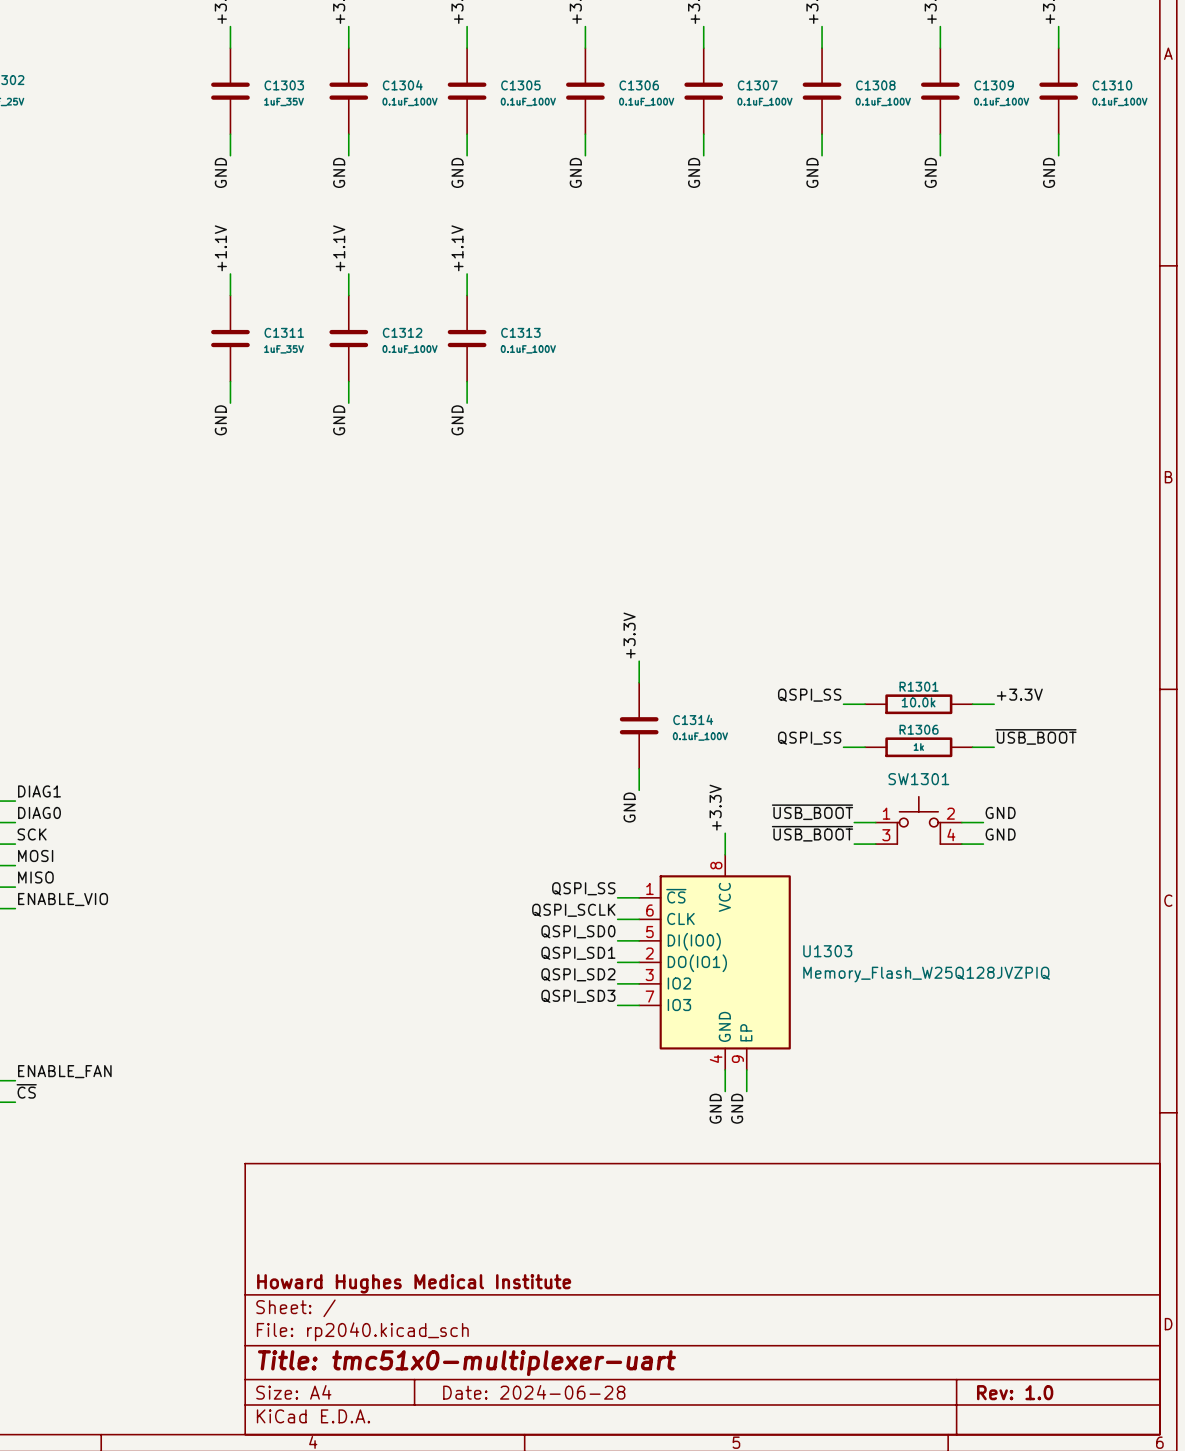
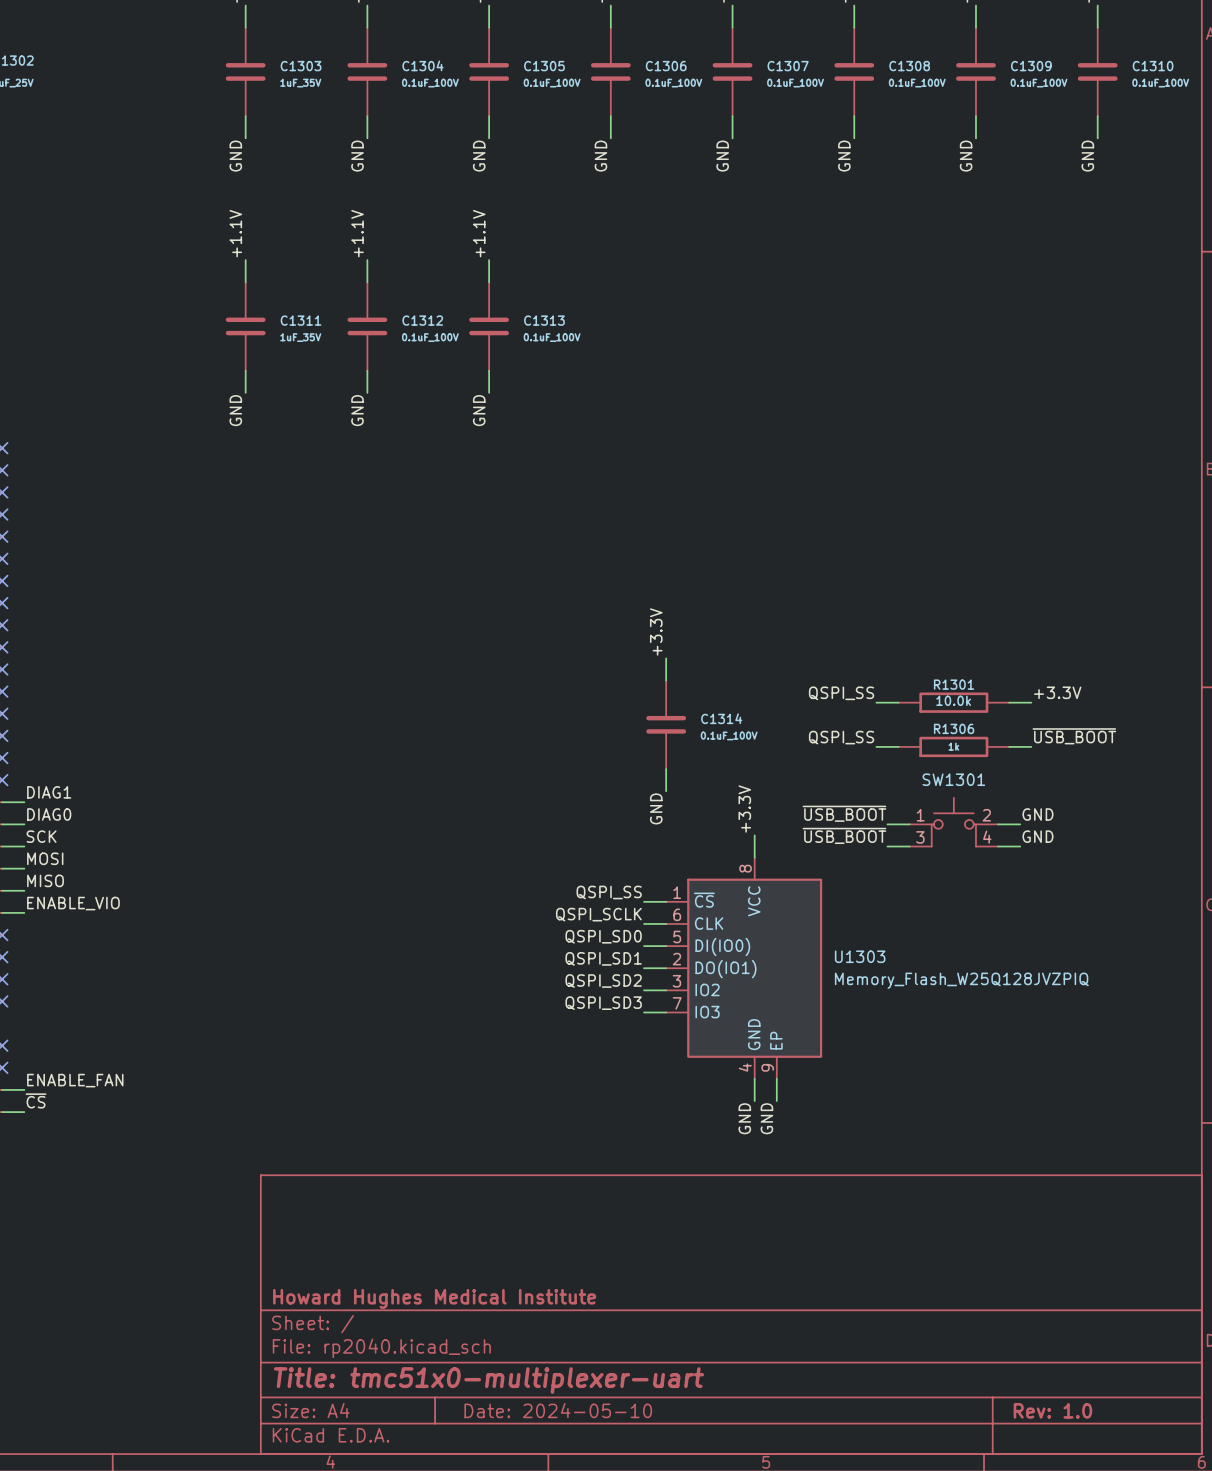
title block: Date: 2024-06-28 (534, 1392) -> Date: 2024-05-10 (558, 1410)

